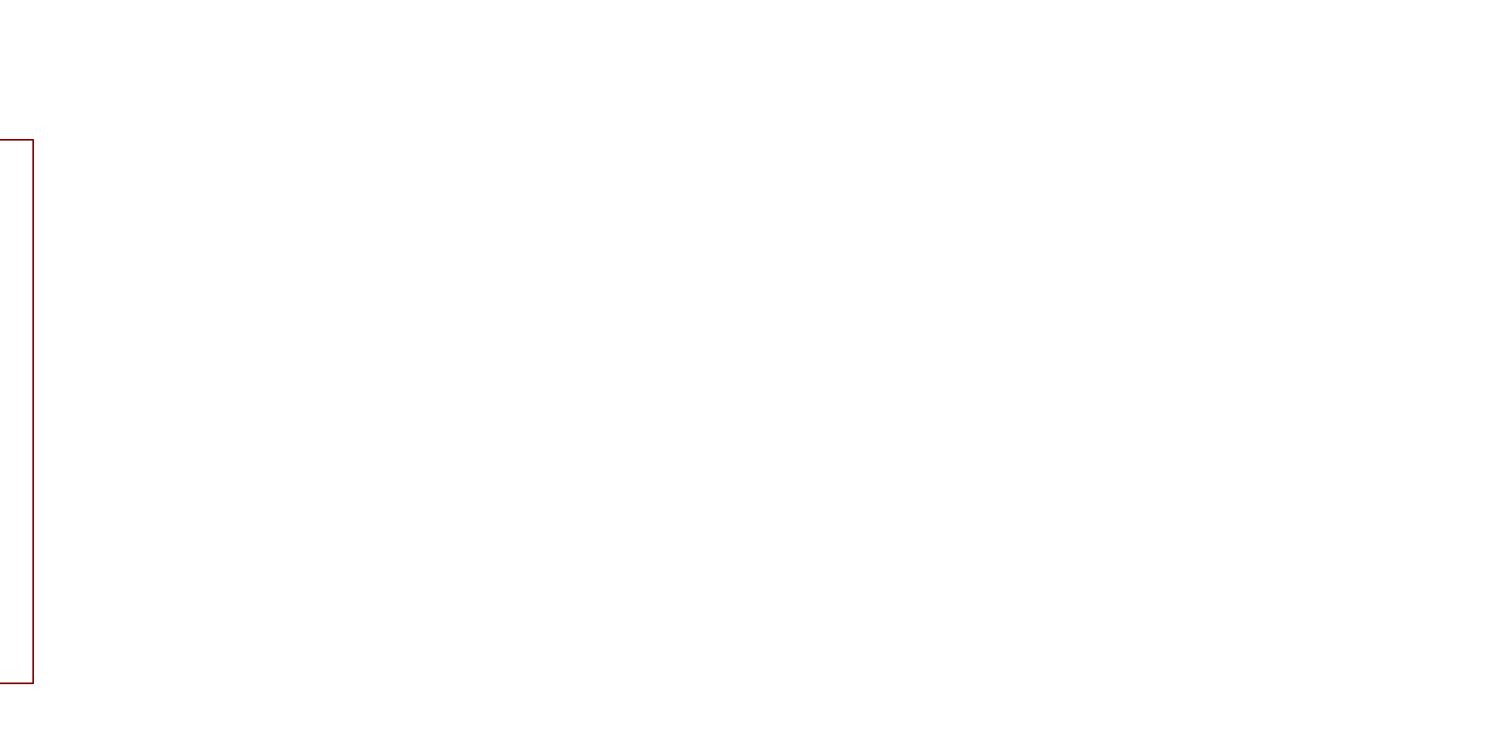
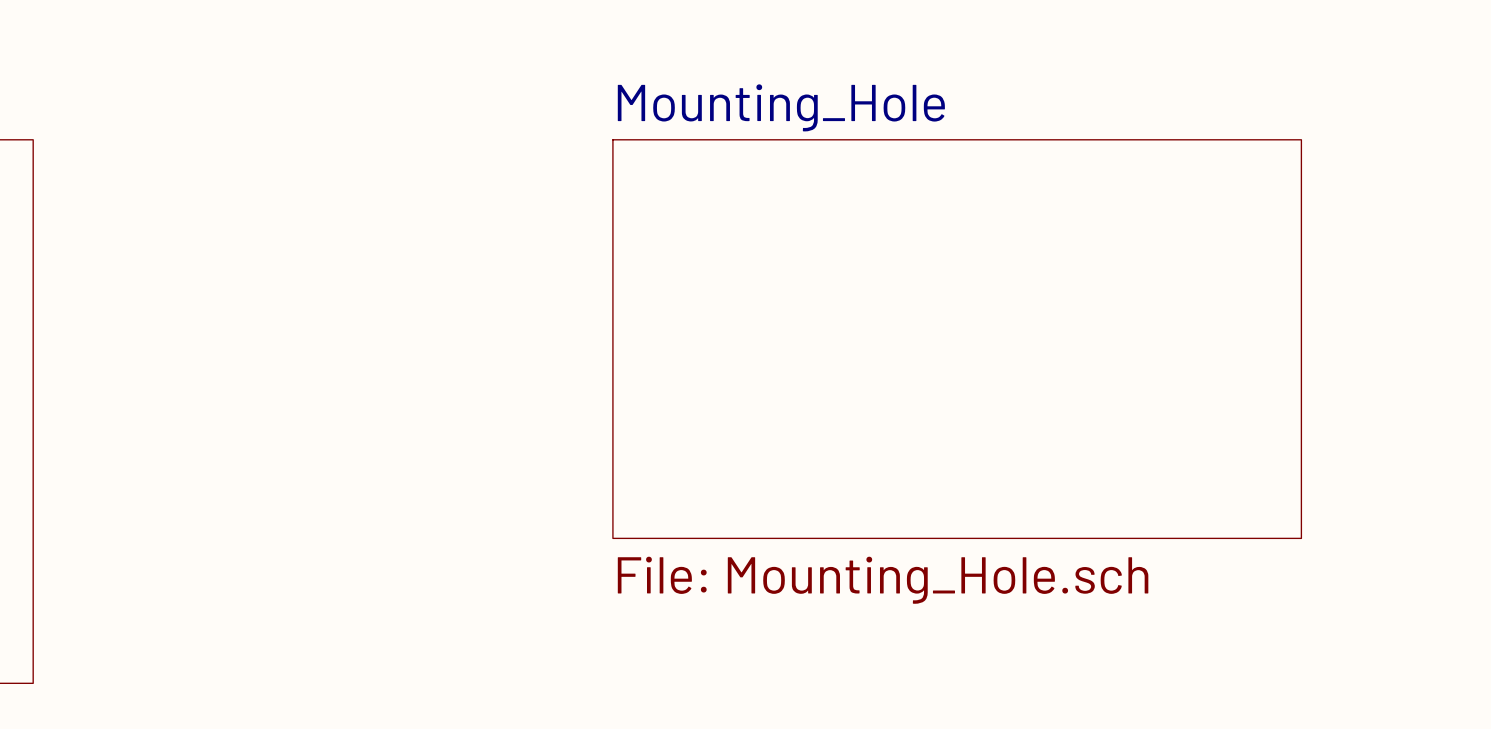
sheet Mounting_Hole: none -> File: Mounting_Hole.sch (957, 339)

